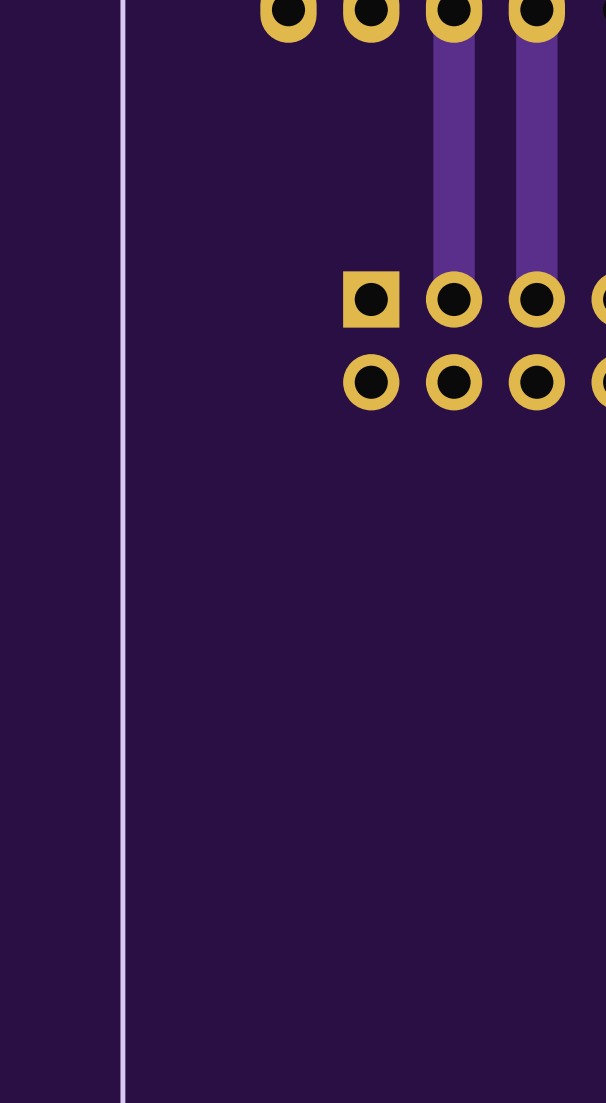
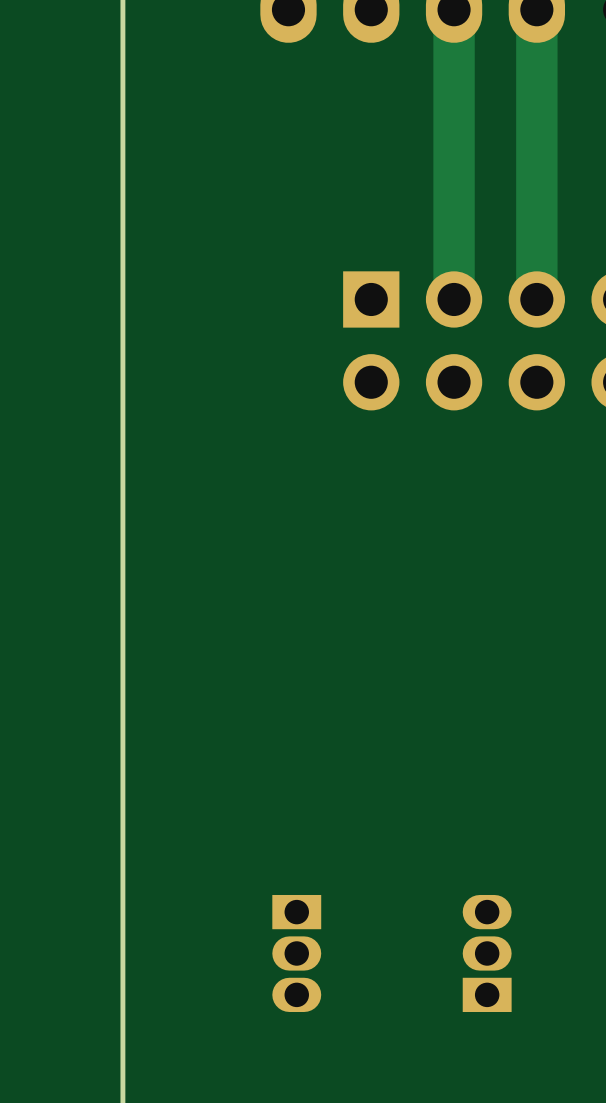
part: none -> (296, 953)
part: none -> (487, 953)

